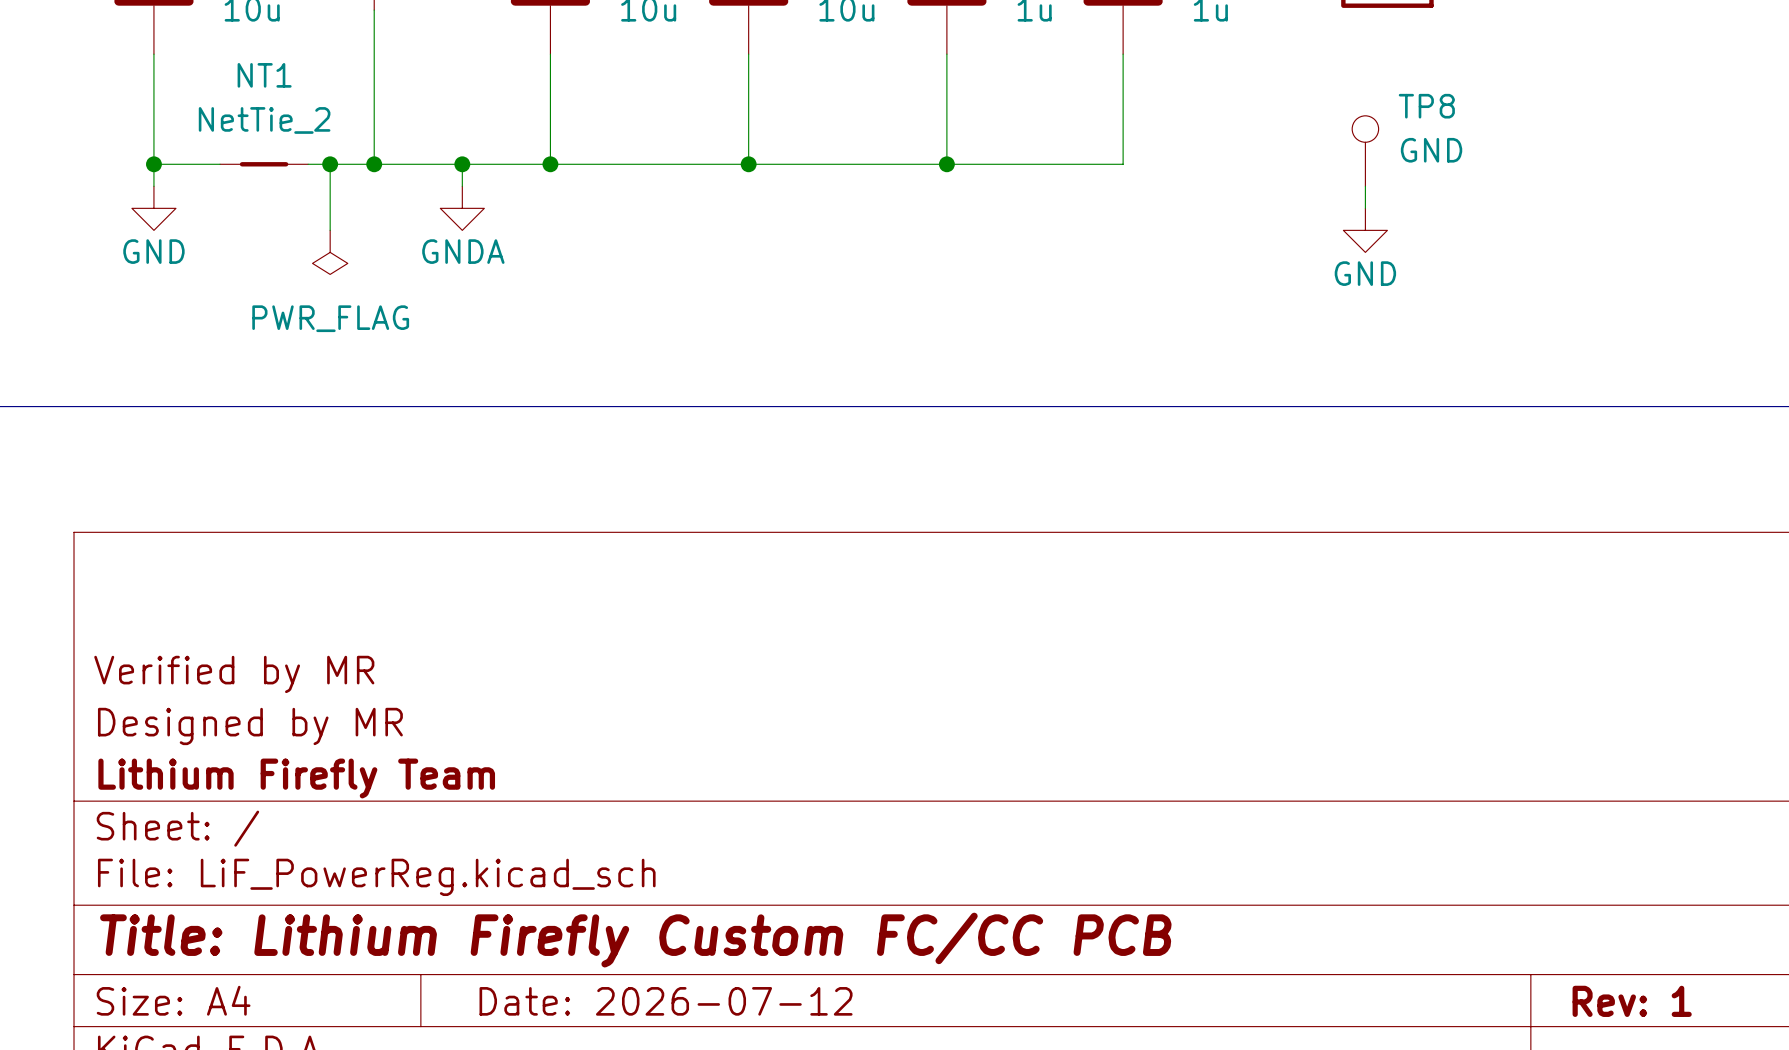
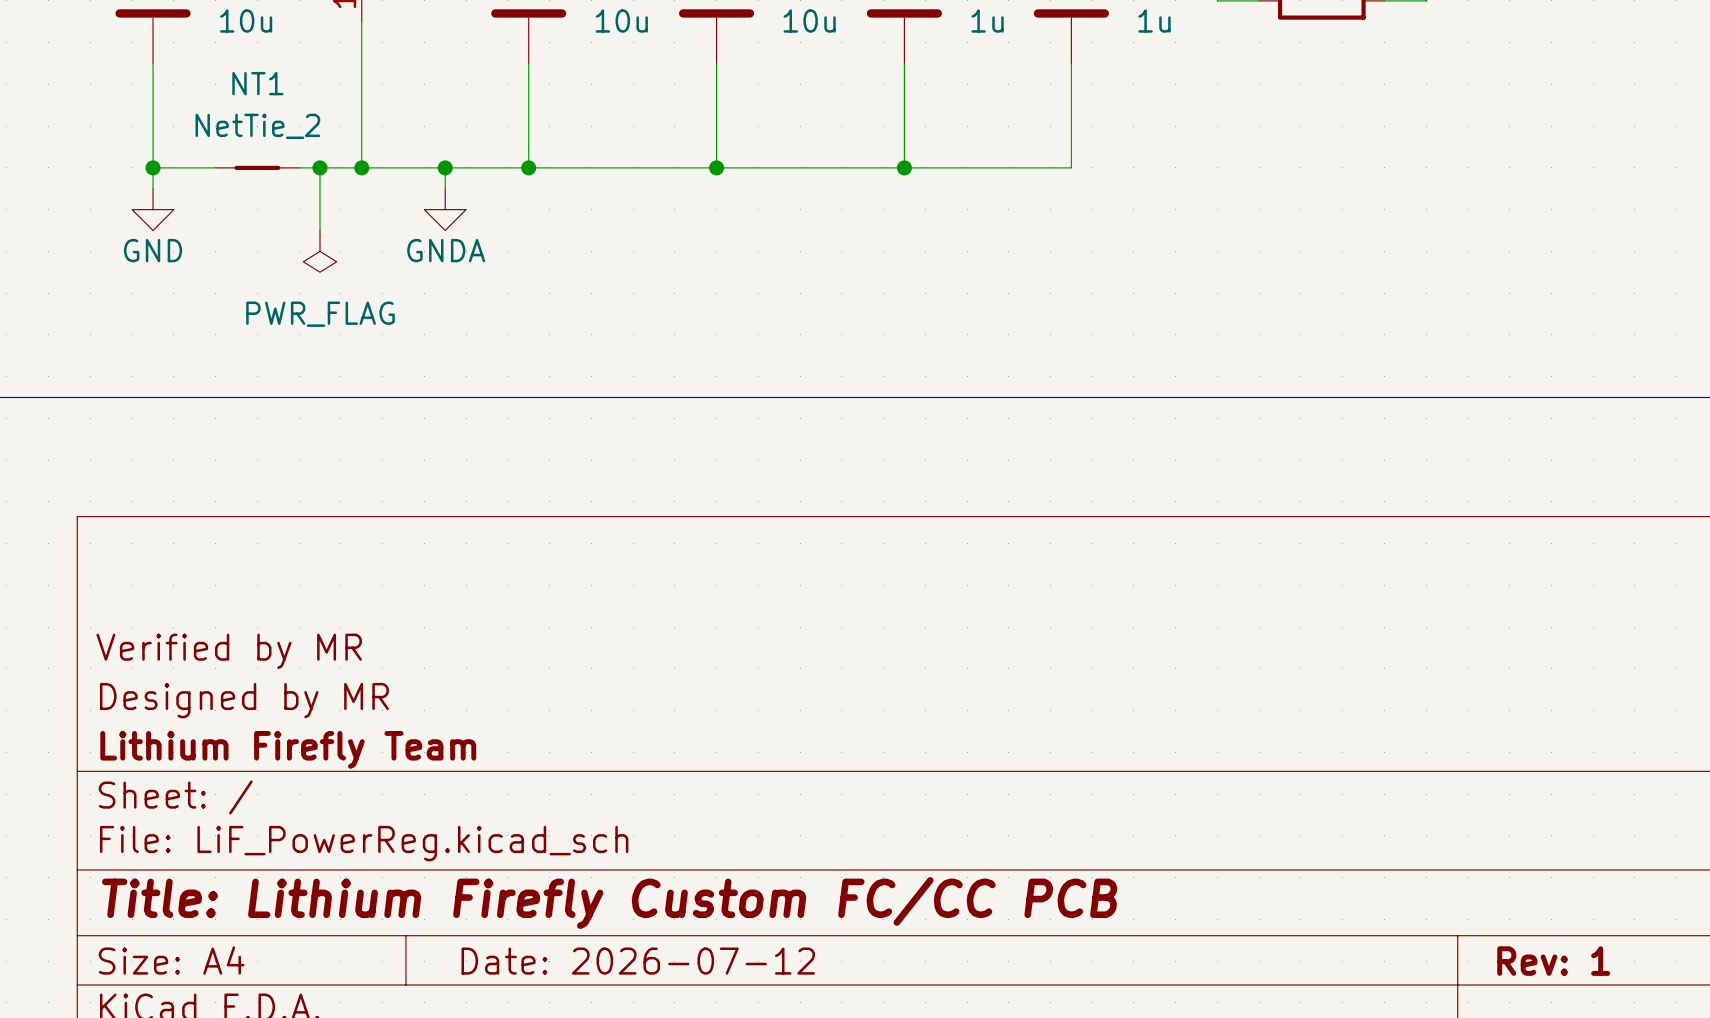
TP8: GND (1365, 151) -> none
wire: (1365, 186) (1365, 208) -> none
power symbol: GND (1365, 230) -> none

